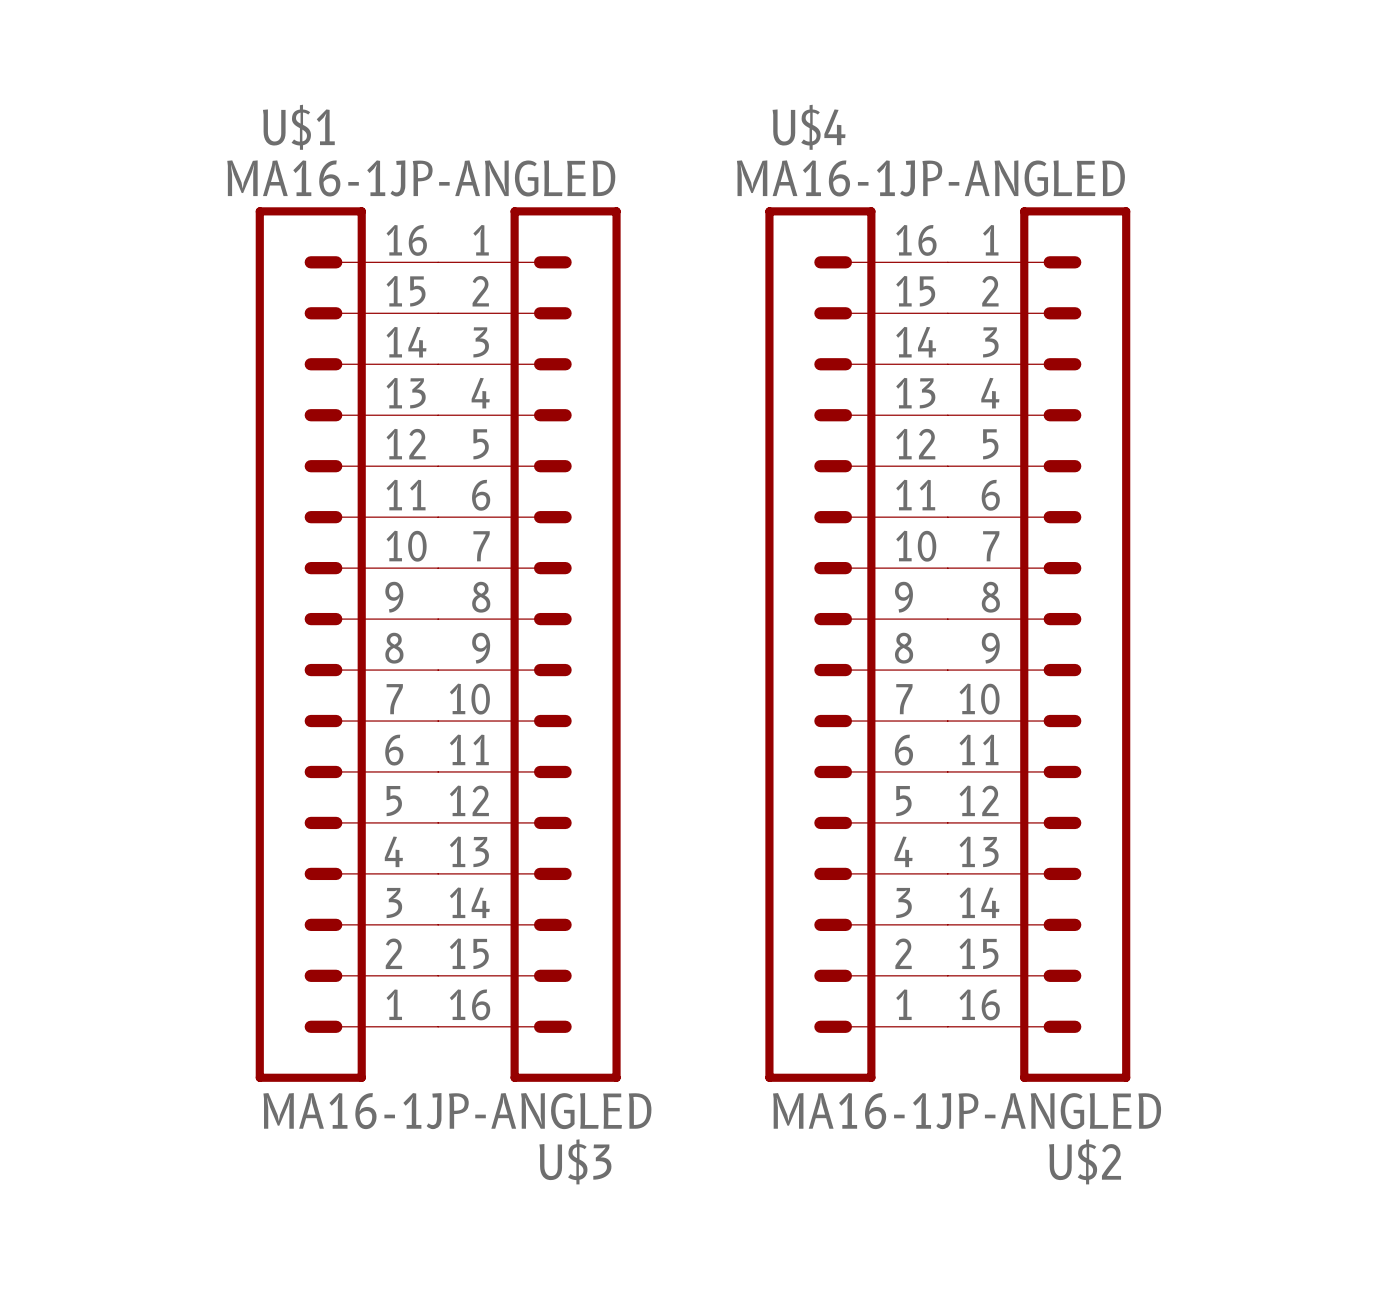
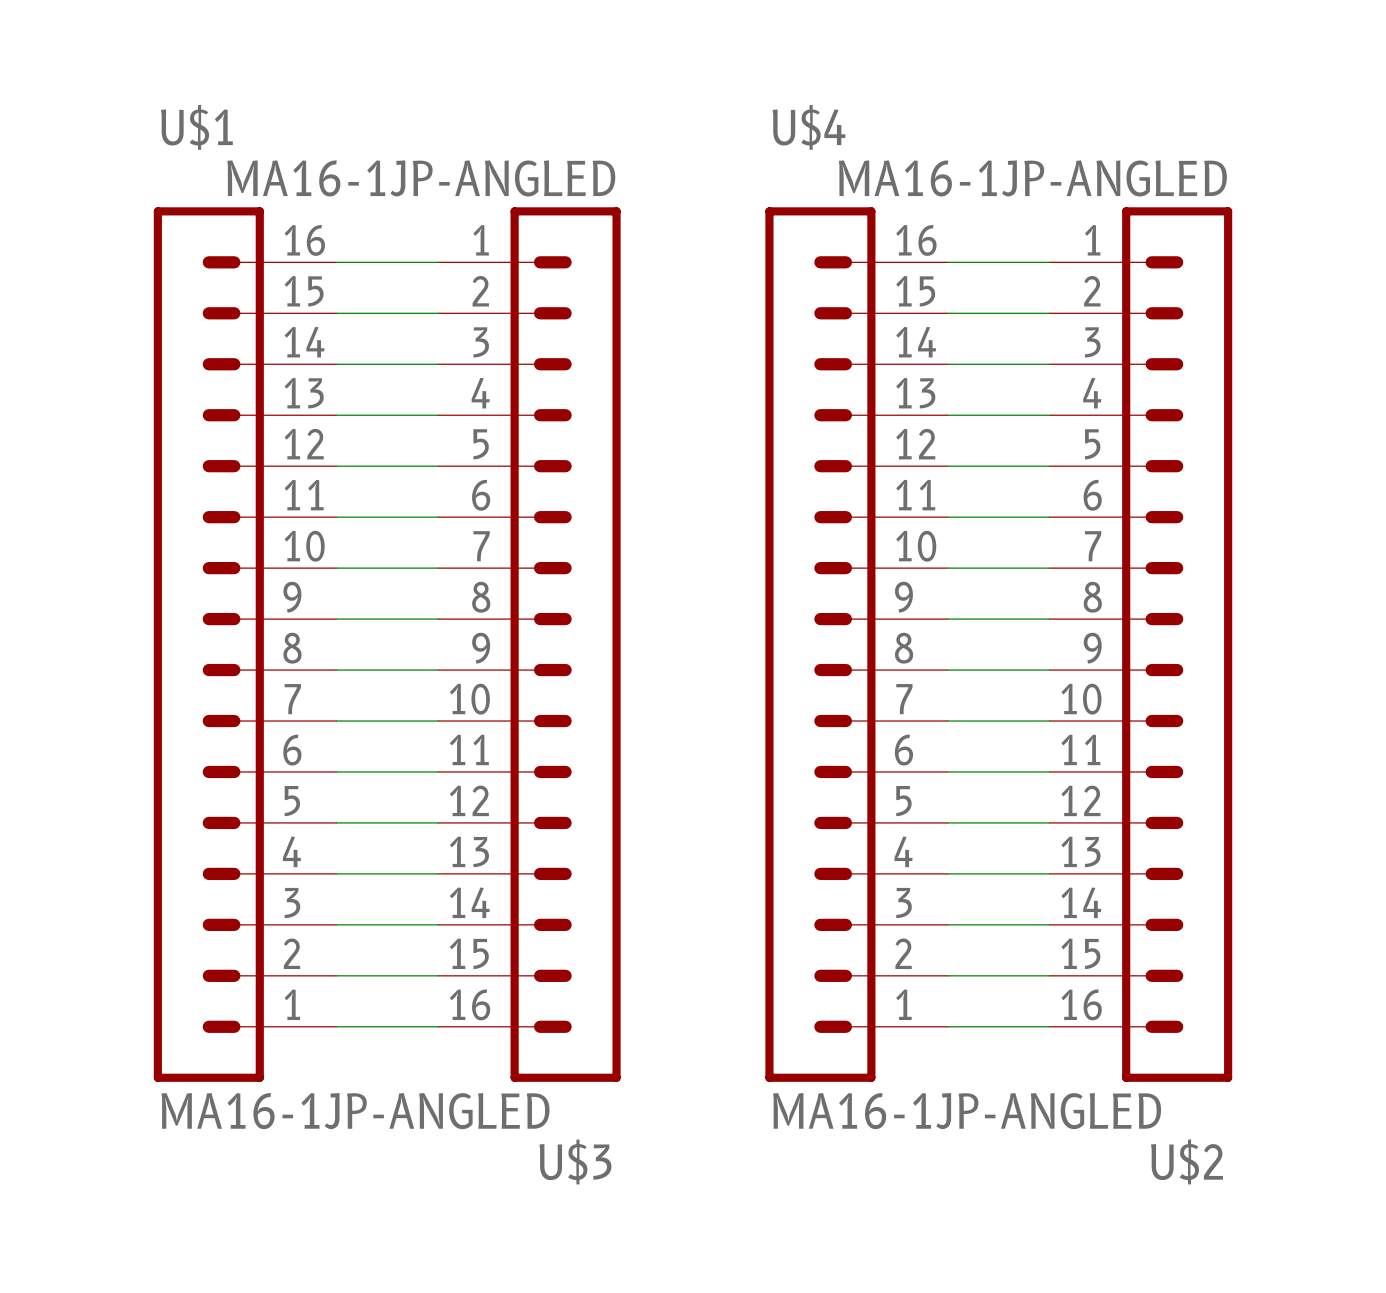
U$1 position: (346, 644) -> (245, 644)
U$2 position: (1039, 644) -> (1140, 644)

